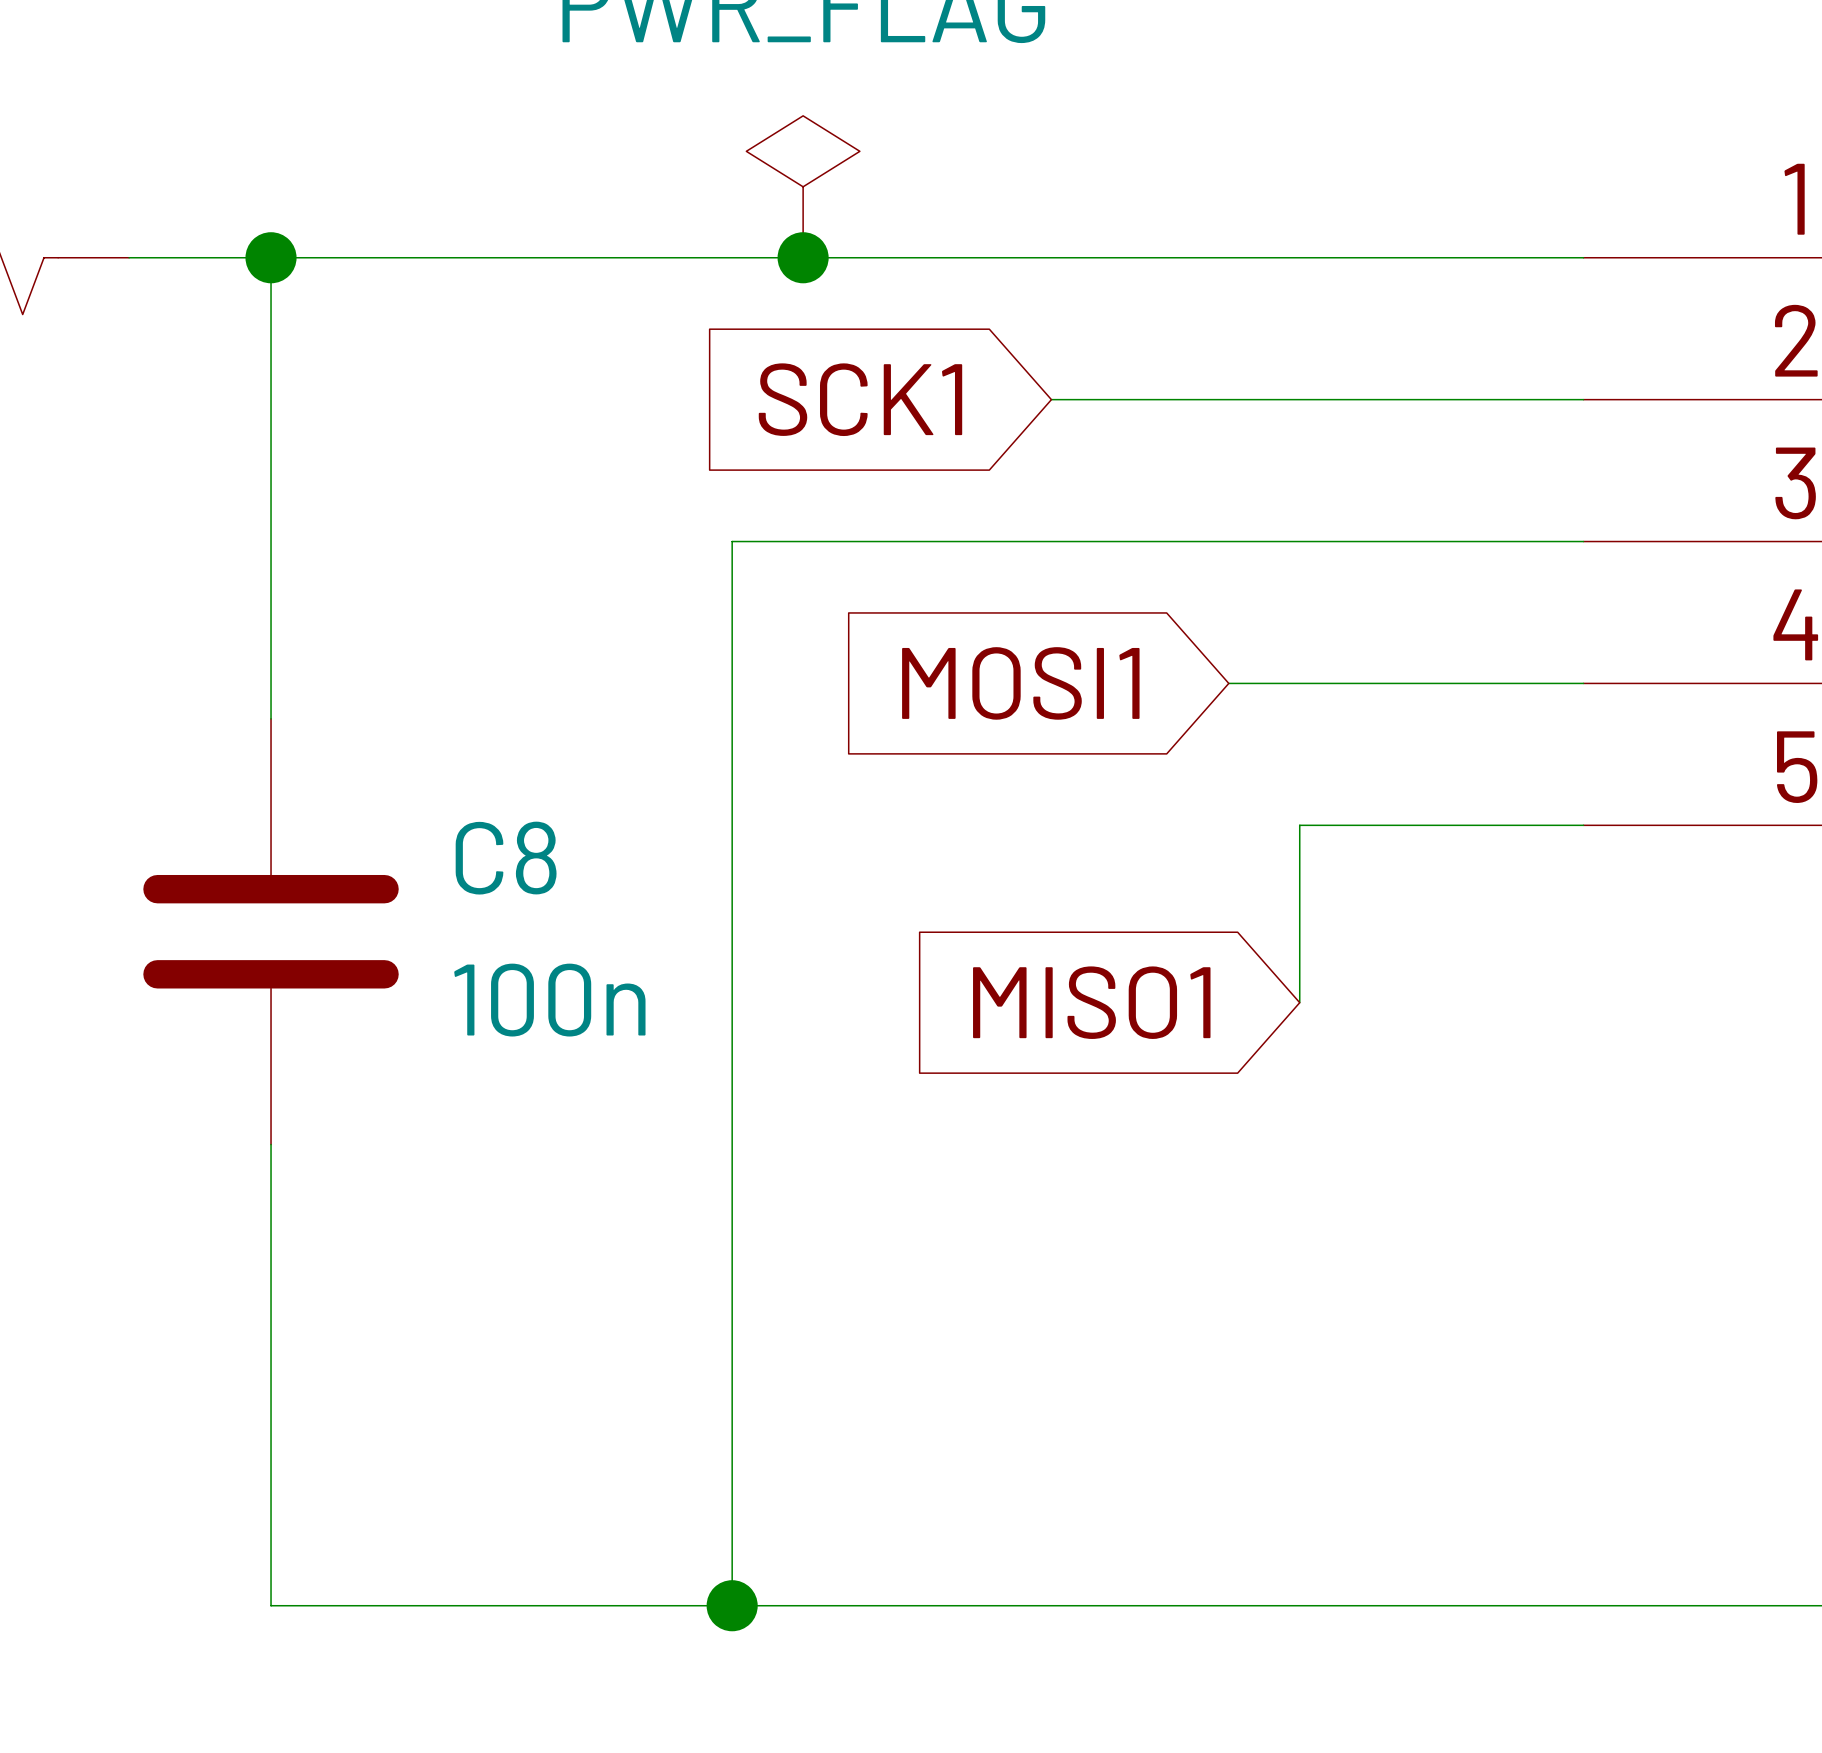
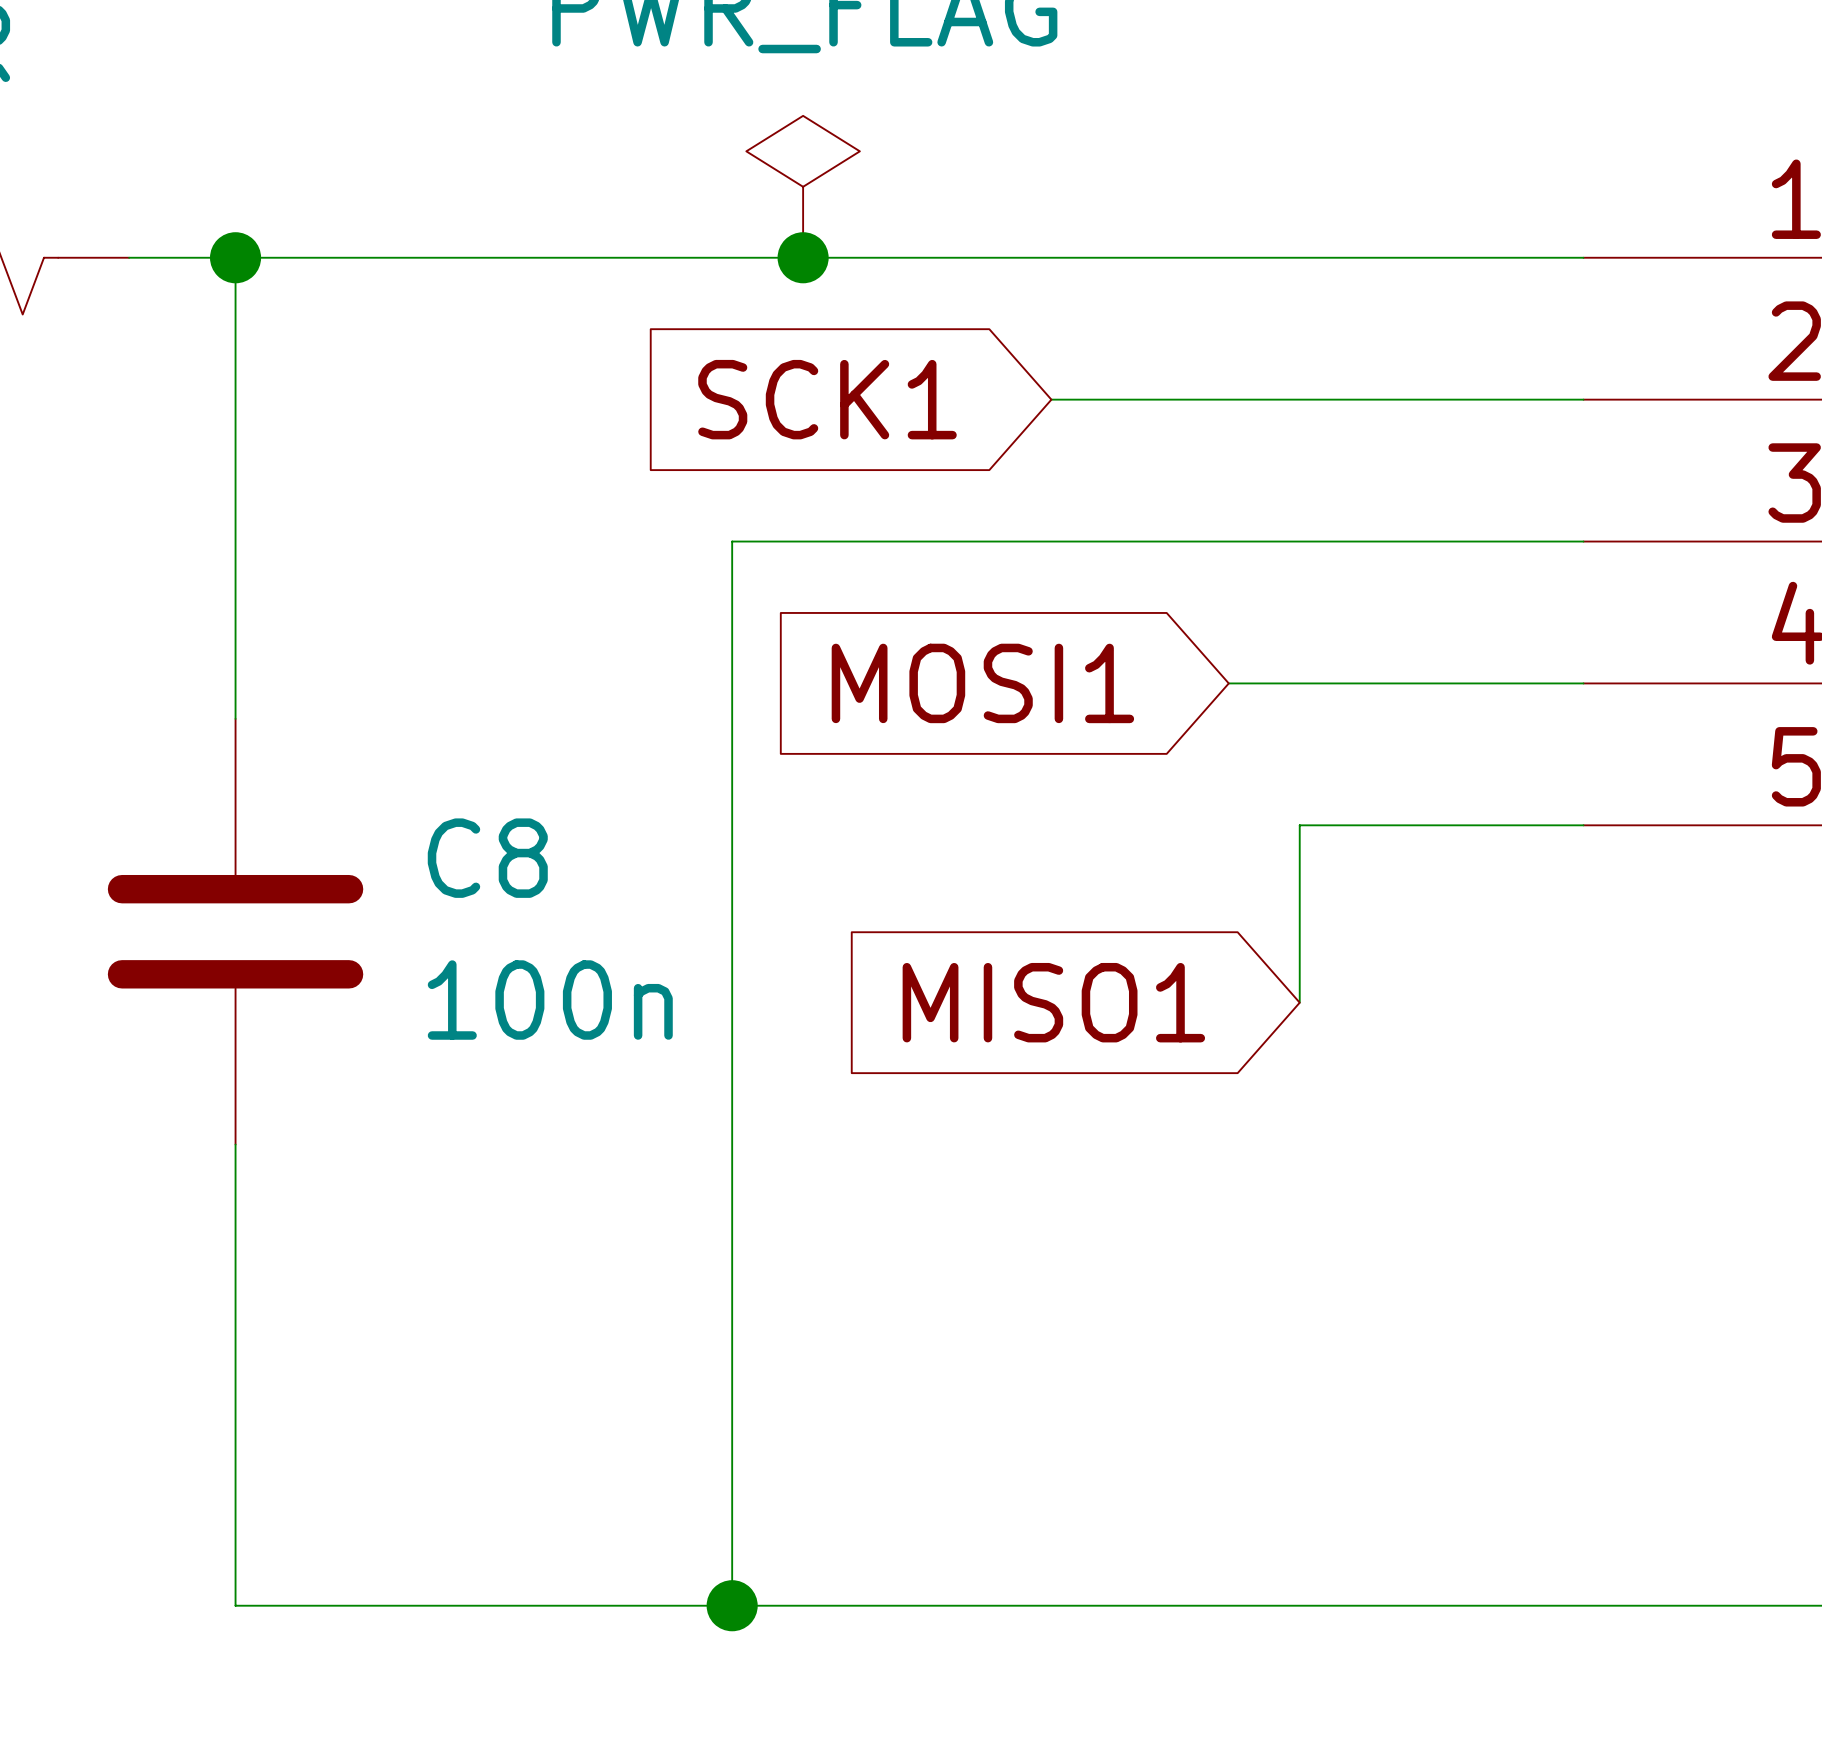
wire: (271, 257) (271, 718) -> (235, 257) (235, 718)
junction position: (271, 257) -> (235, 257)
C8 position: (271, 931) -> (235, 931)
wire: (271, 1144) (271, 1605) -> (235, 1144) (235, 1605) (271, 1605)

